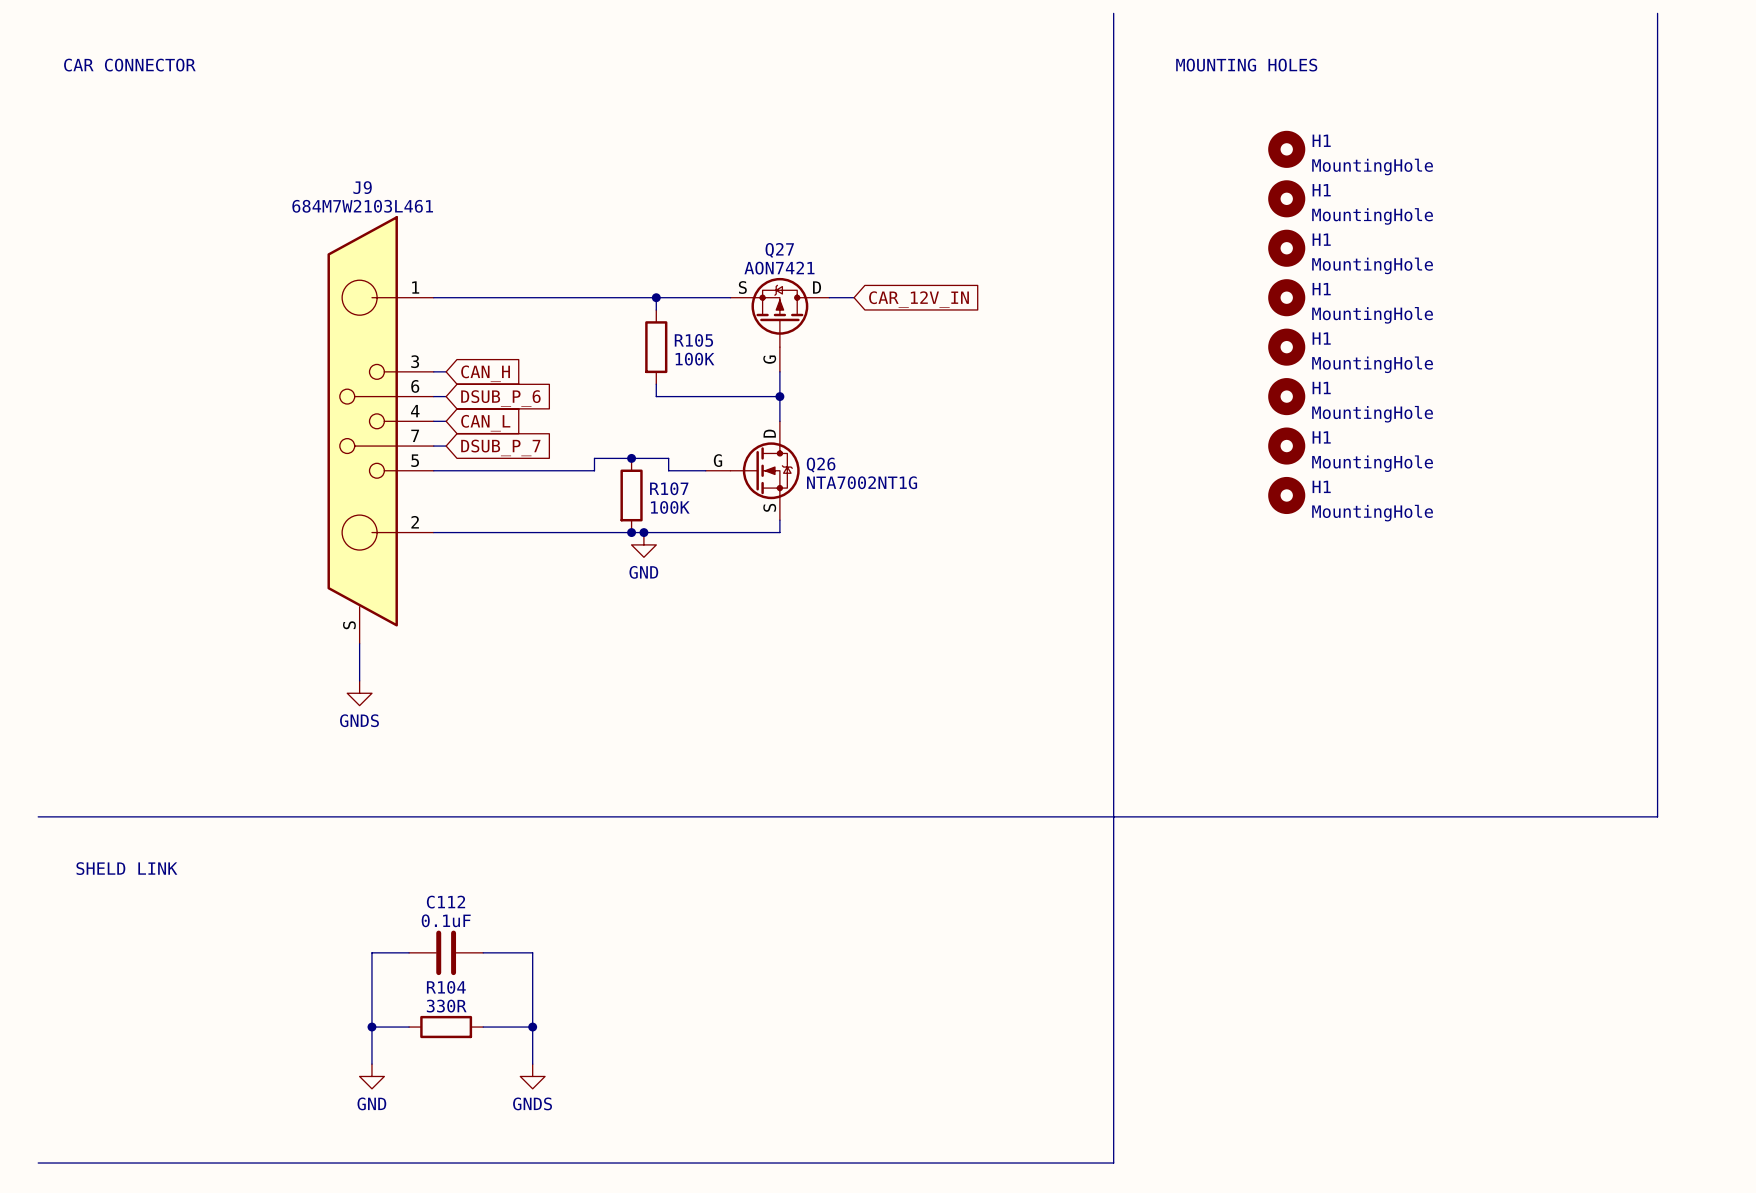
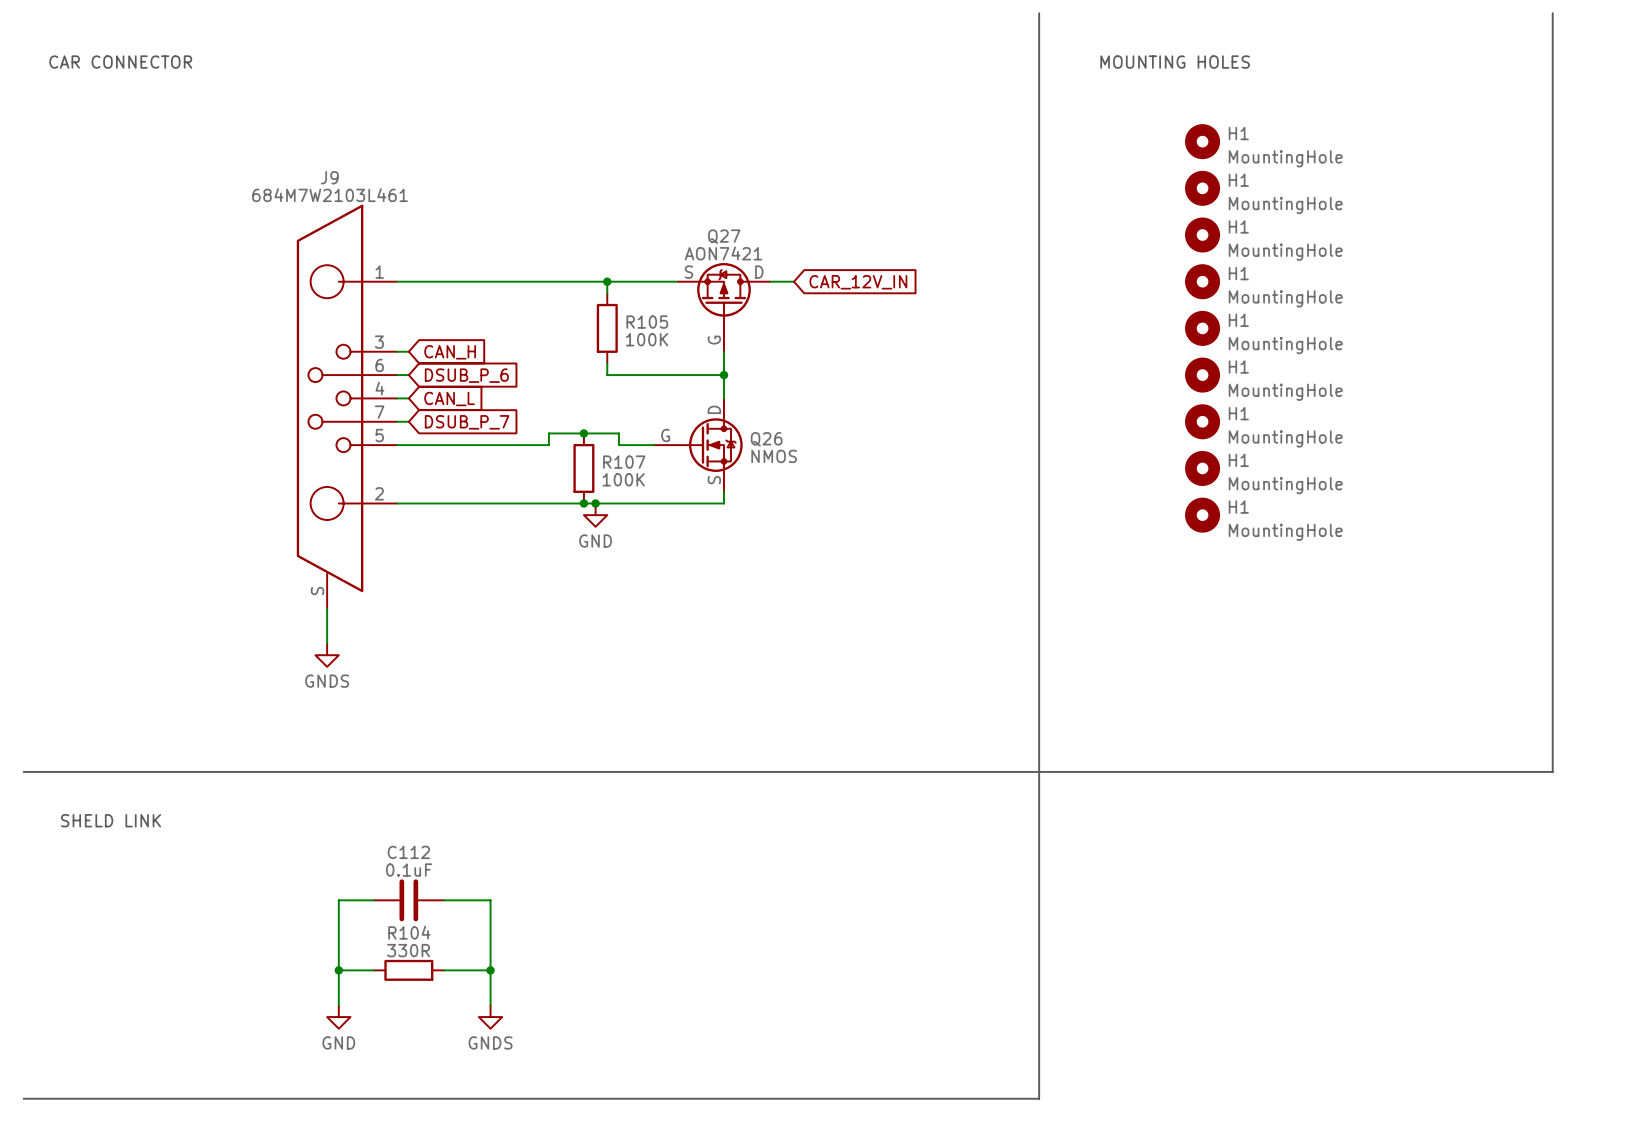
Q26 value: NTA7002NT1G (862, 482) -> NMOS (774, 456)
H1: none -> MountingHole (1202, 515)

